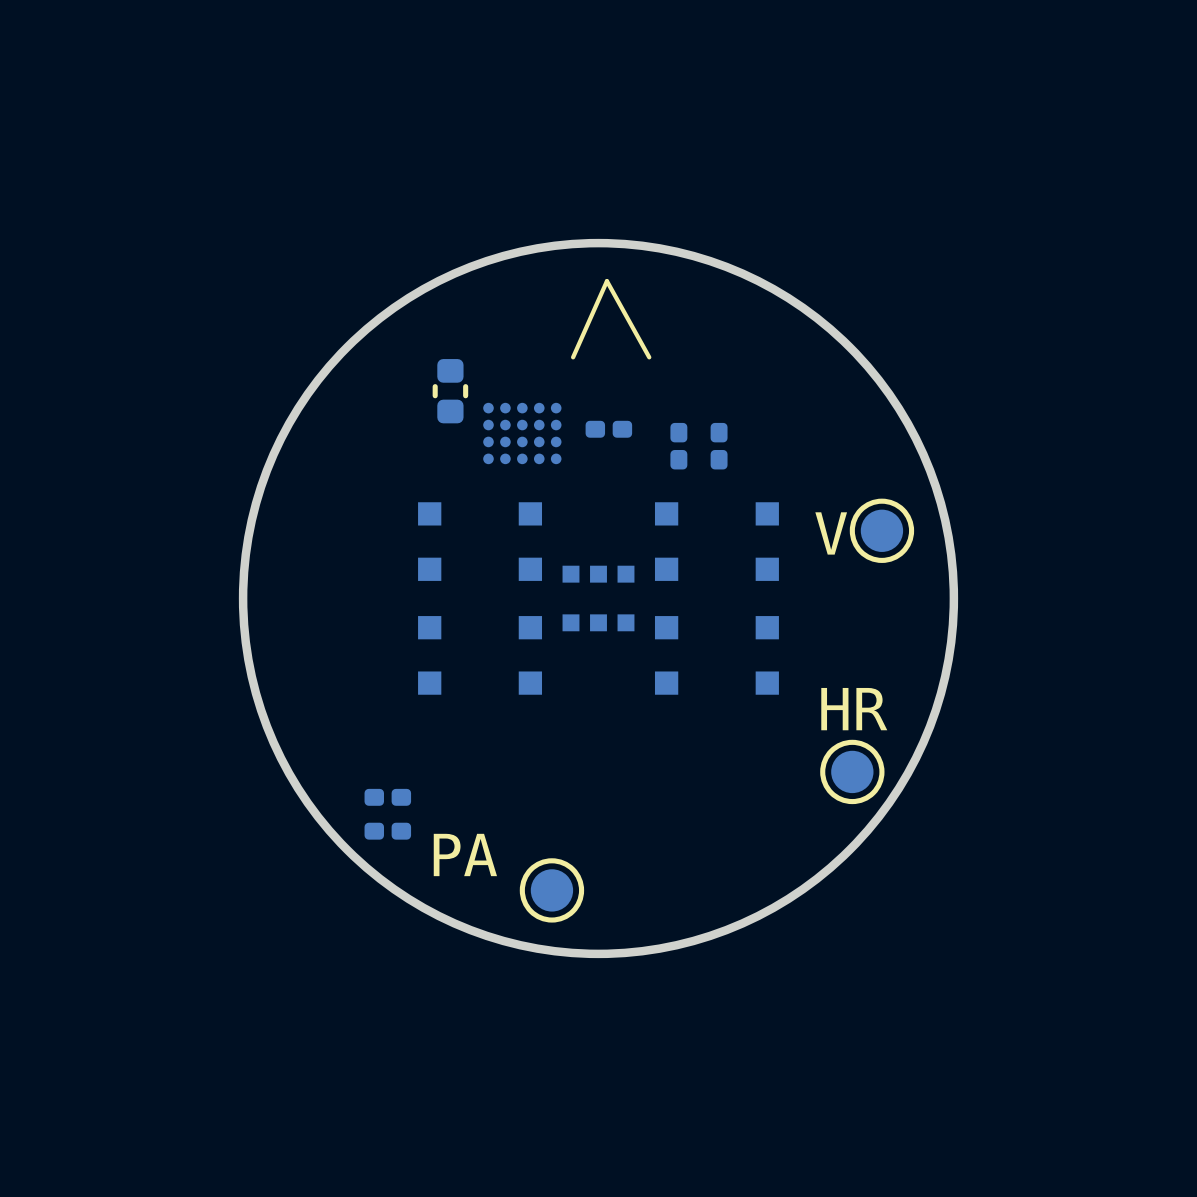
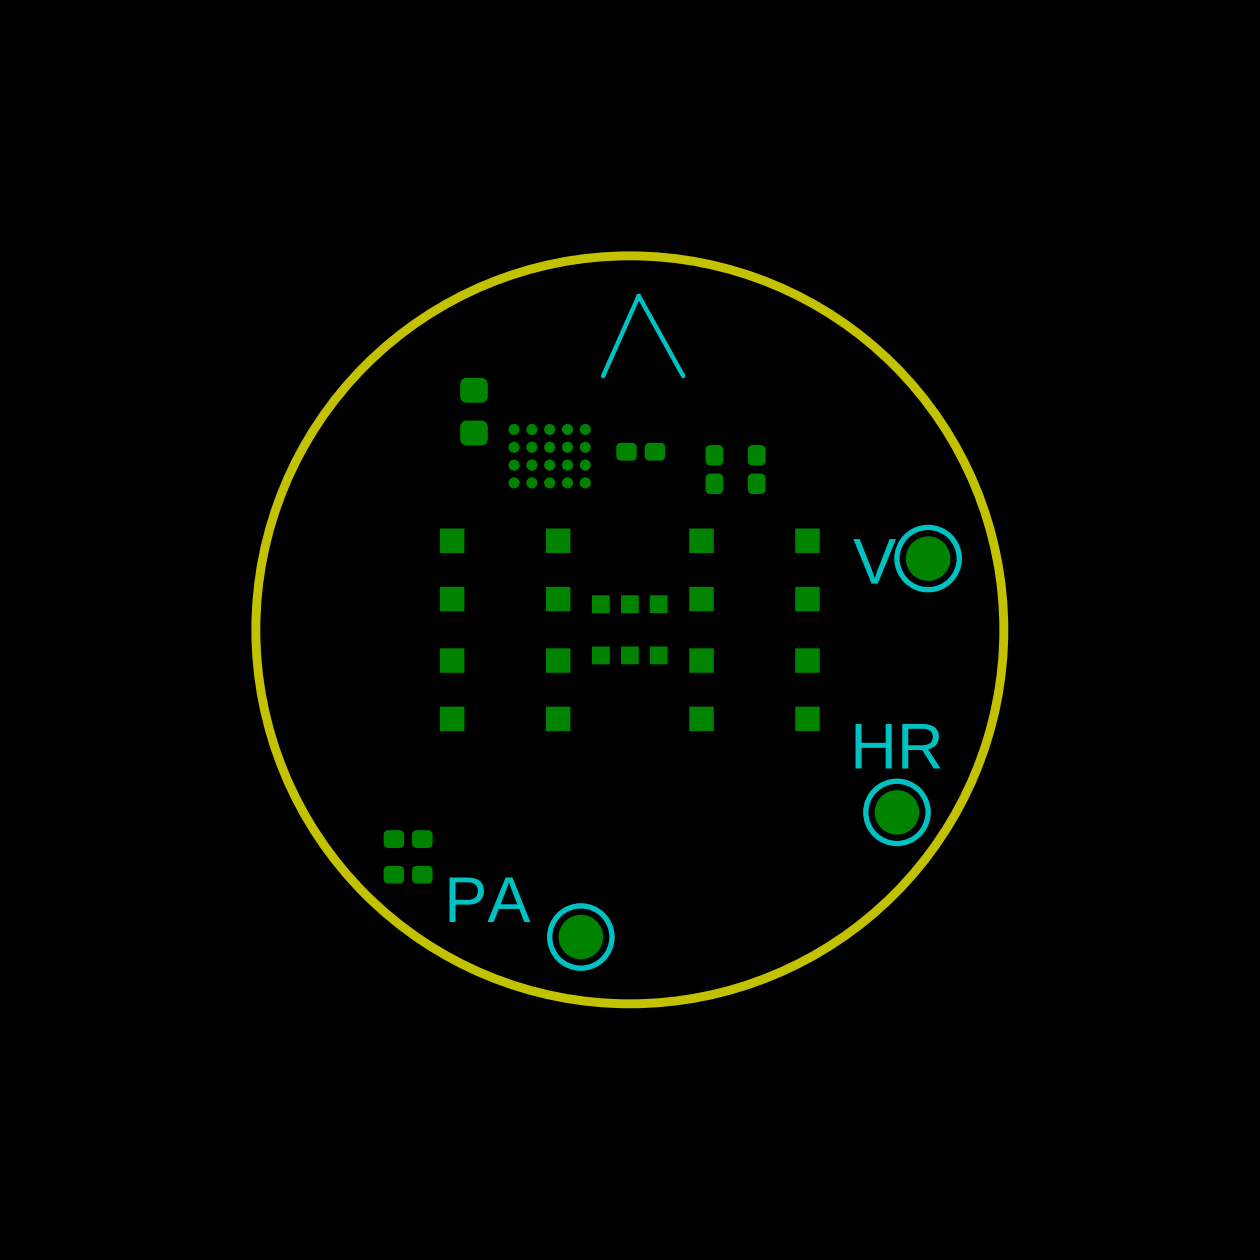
part footprint: [432, 359, 469, 424] -> [460, 377, 488, 446]

